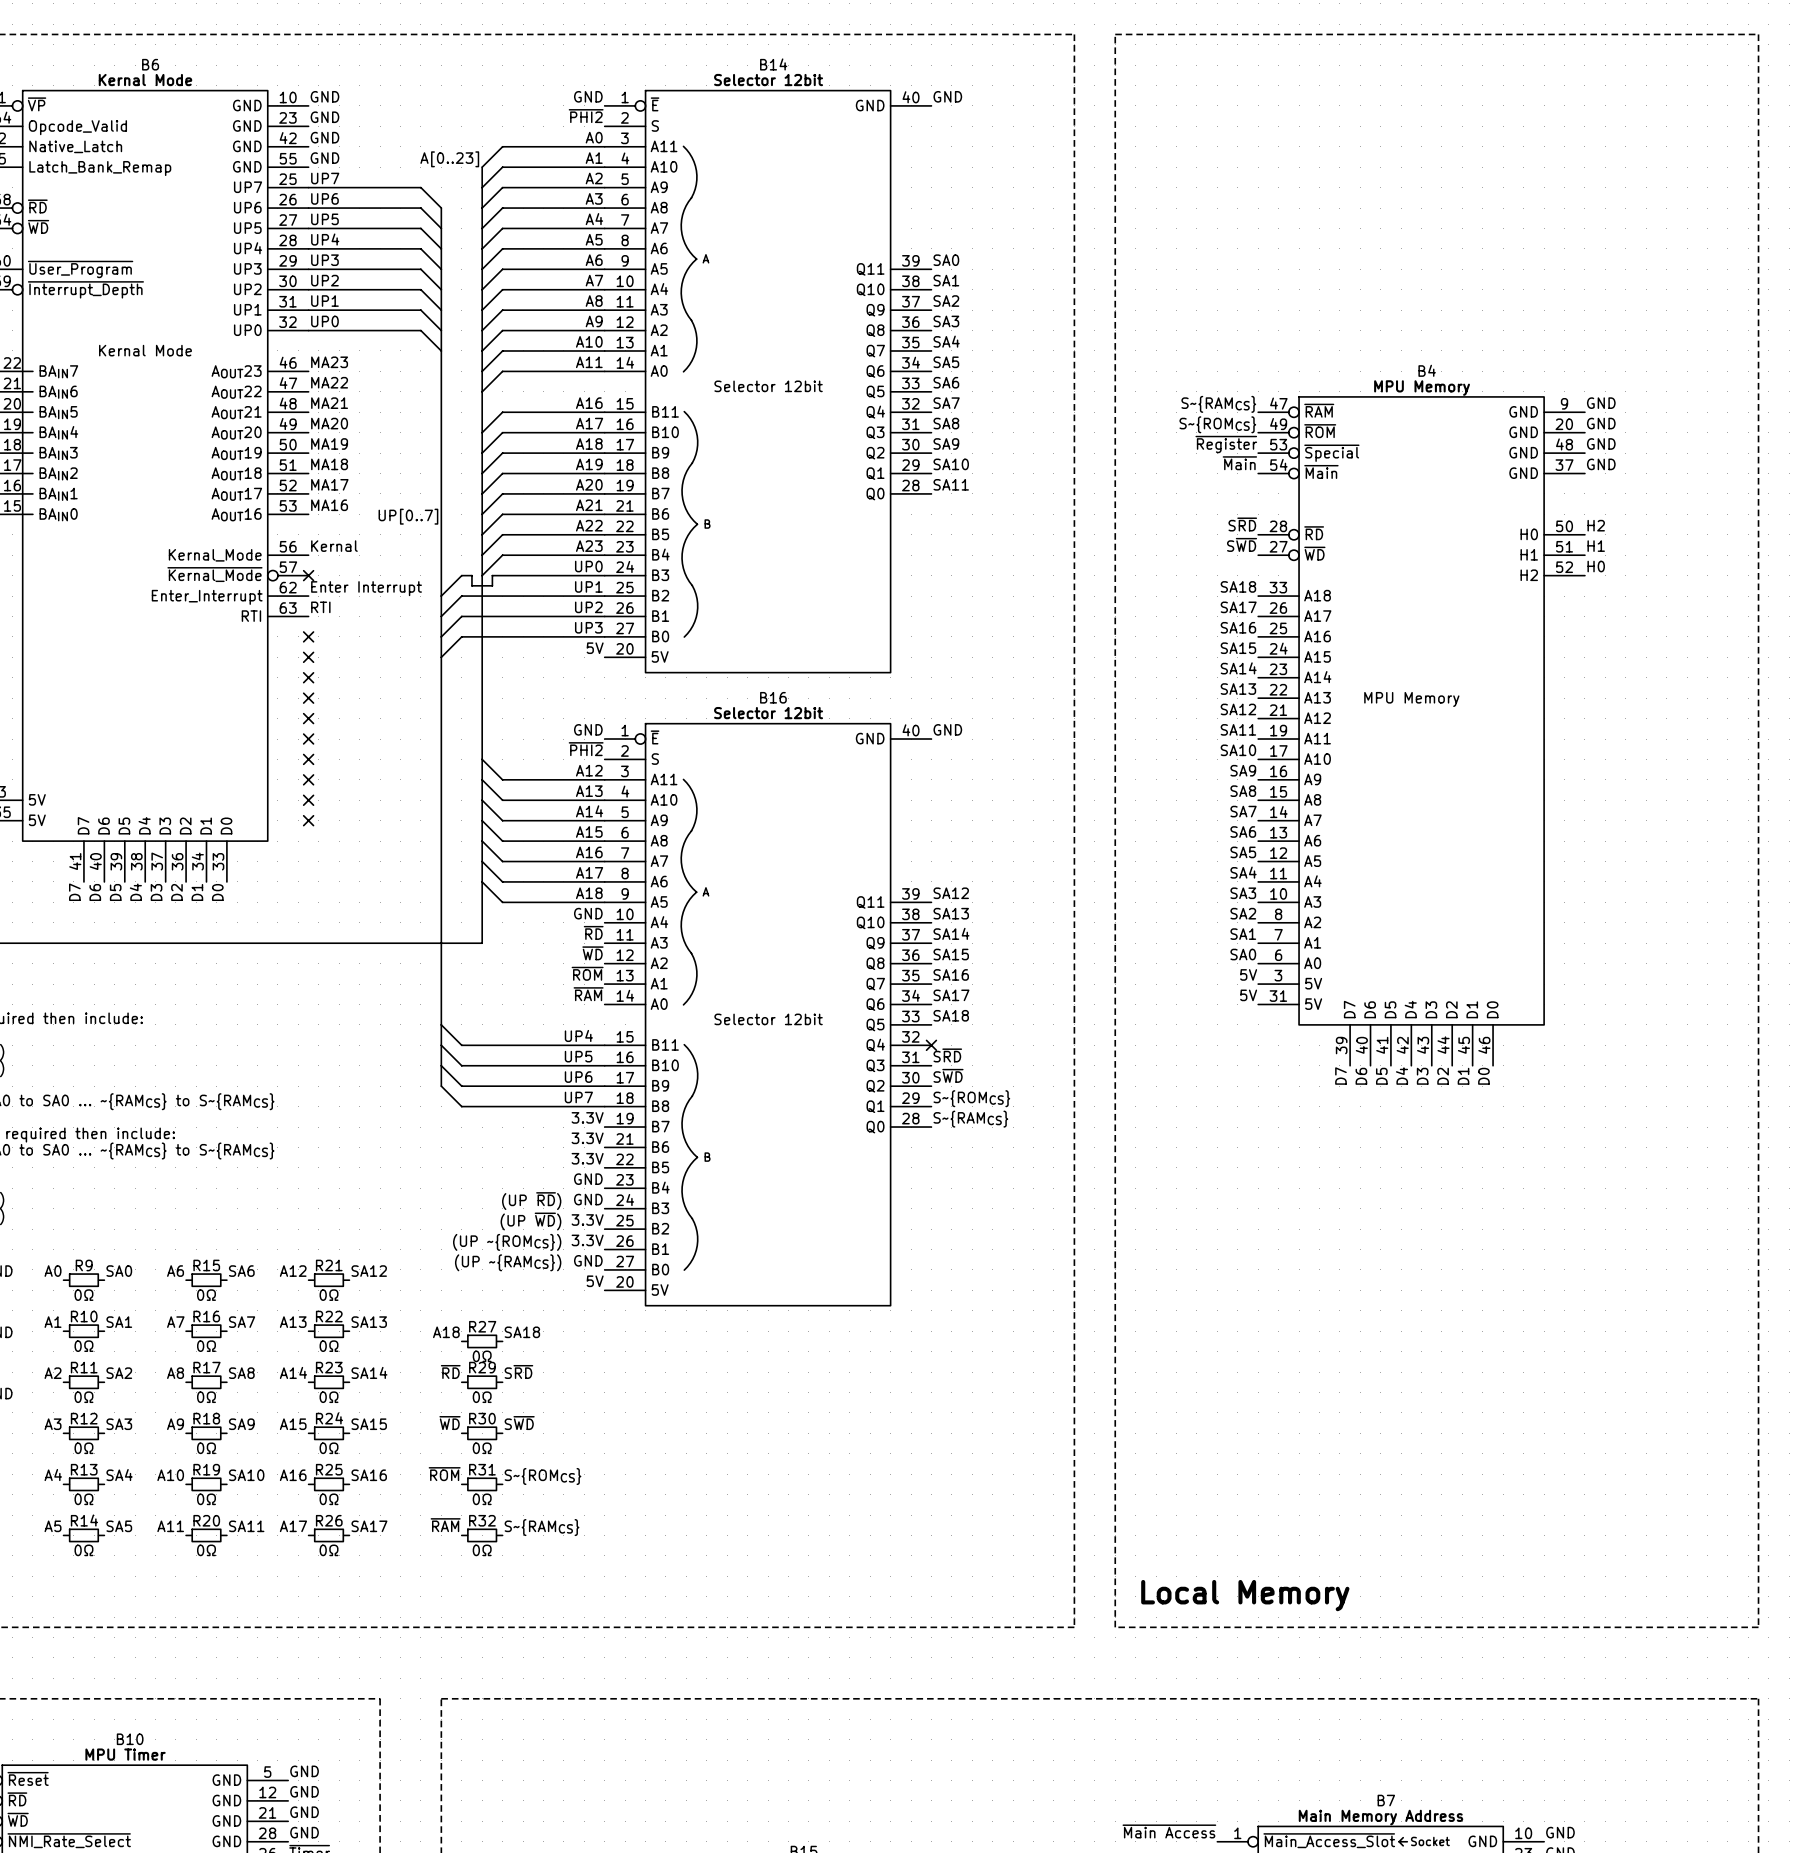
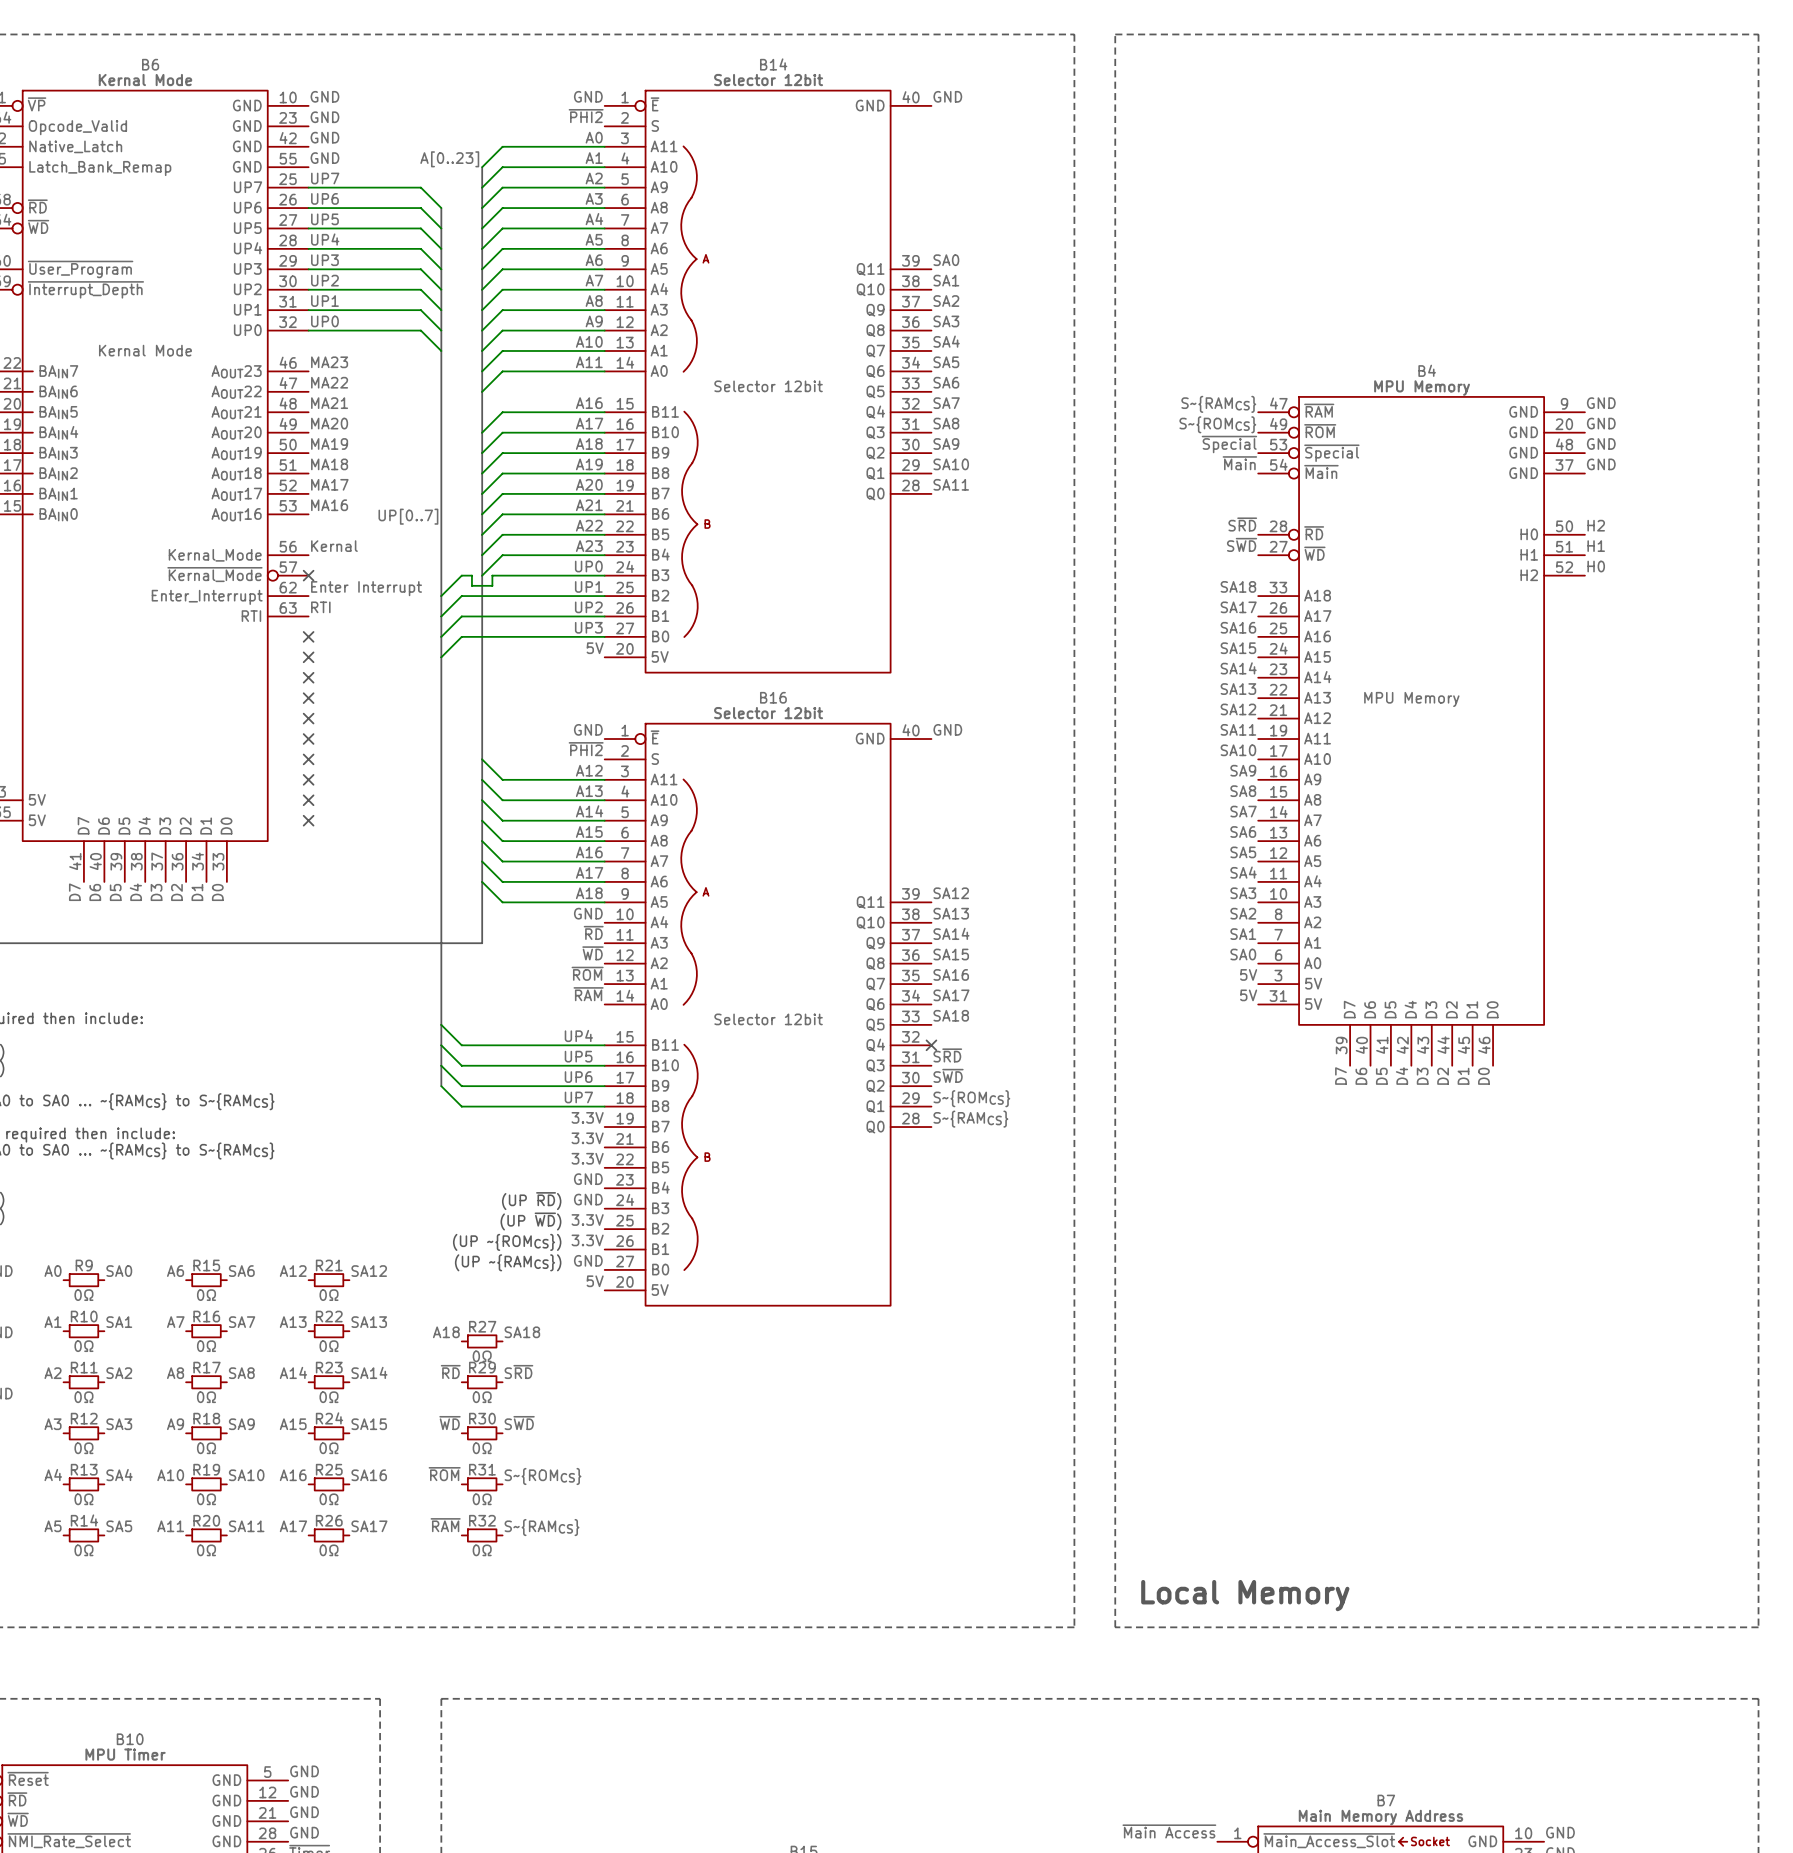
label: ~{Register} (1226, 444) -> ~{Special} (1229, 444)

